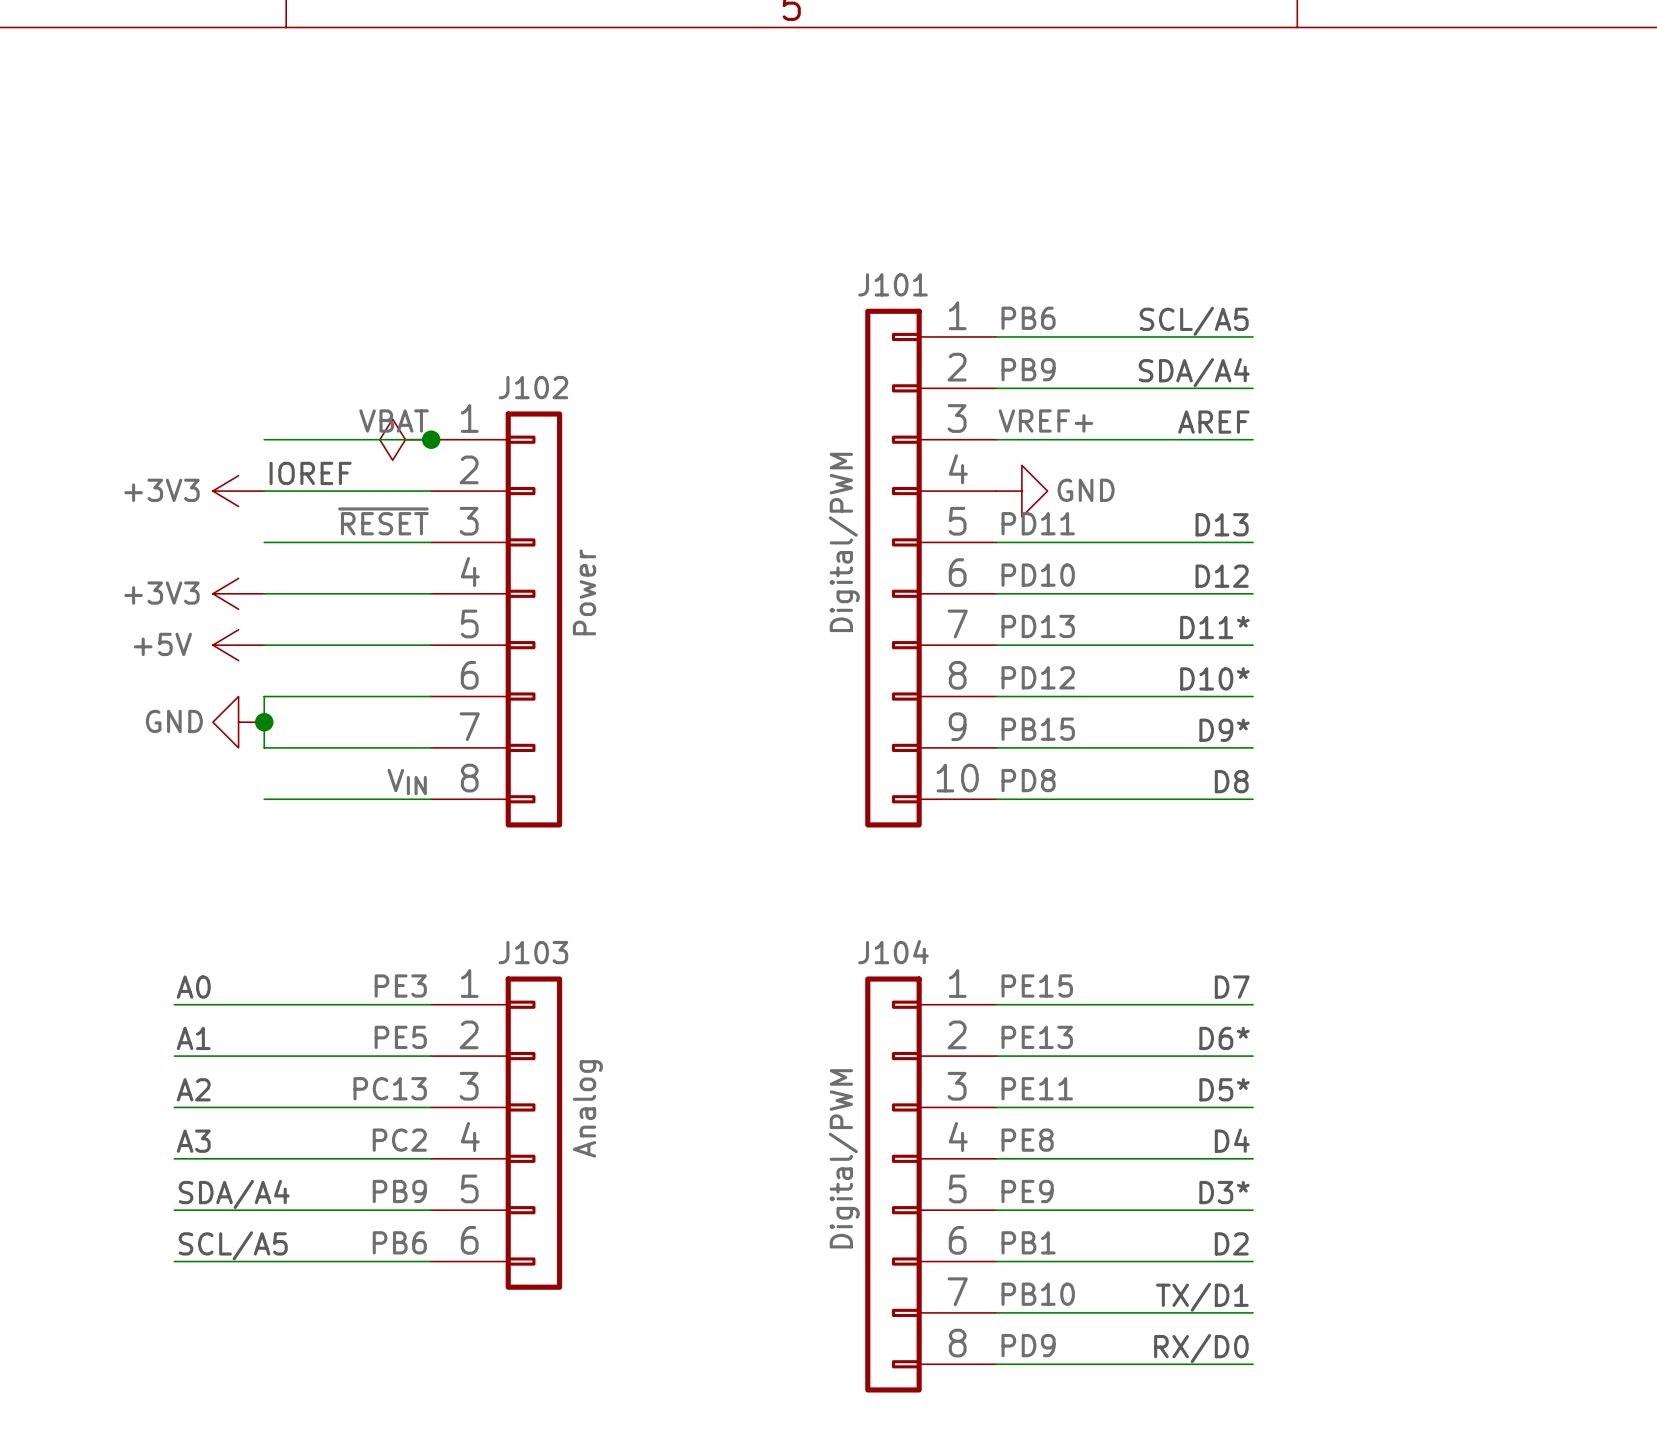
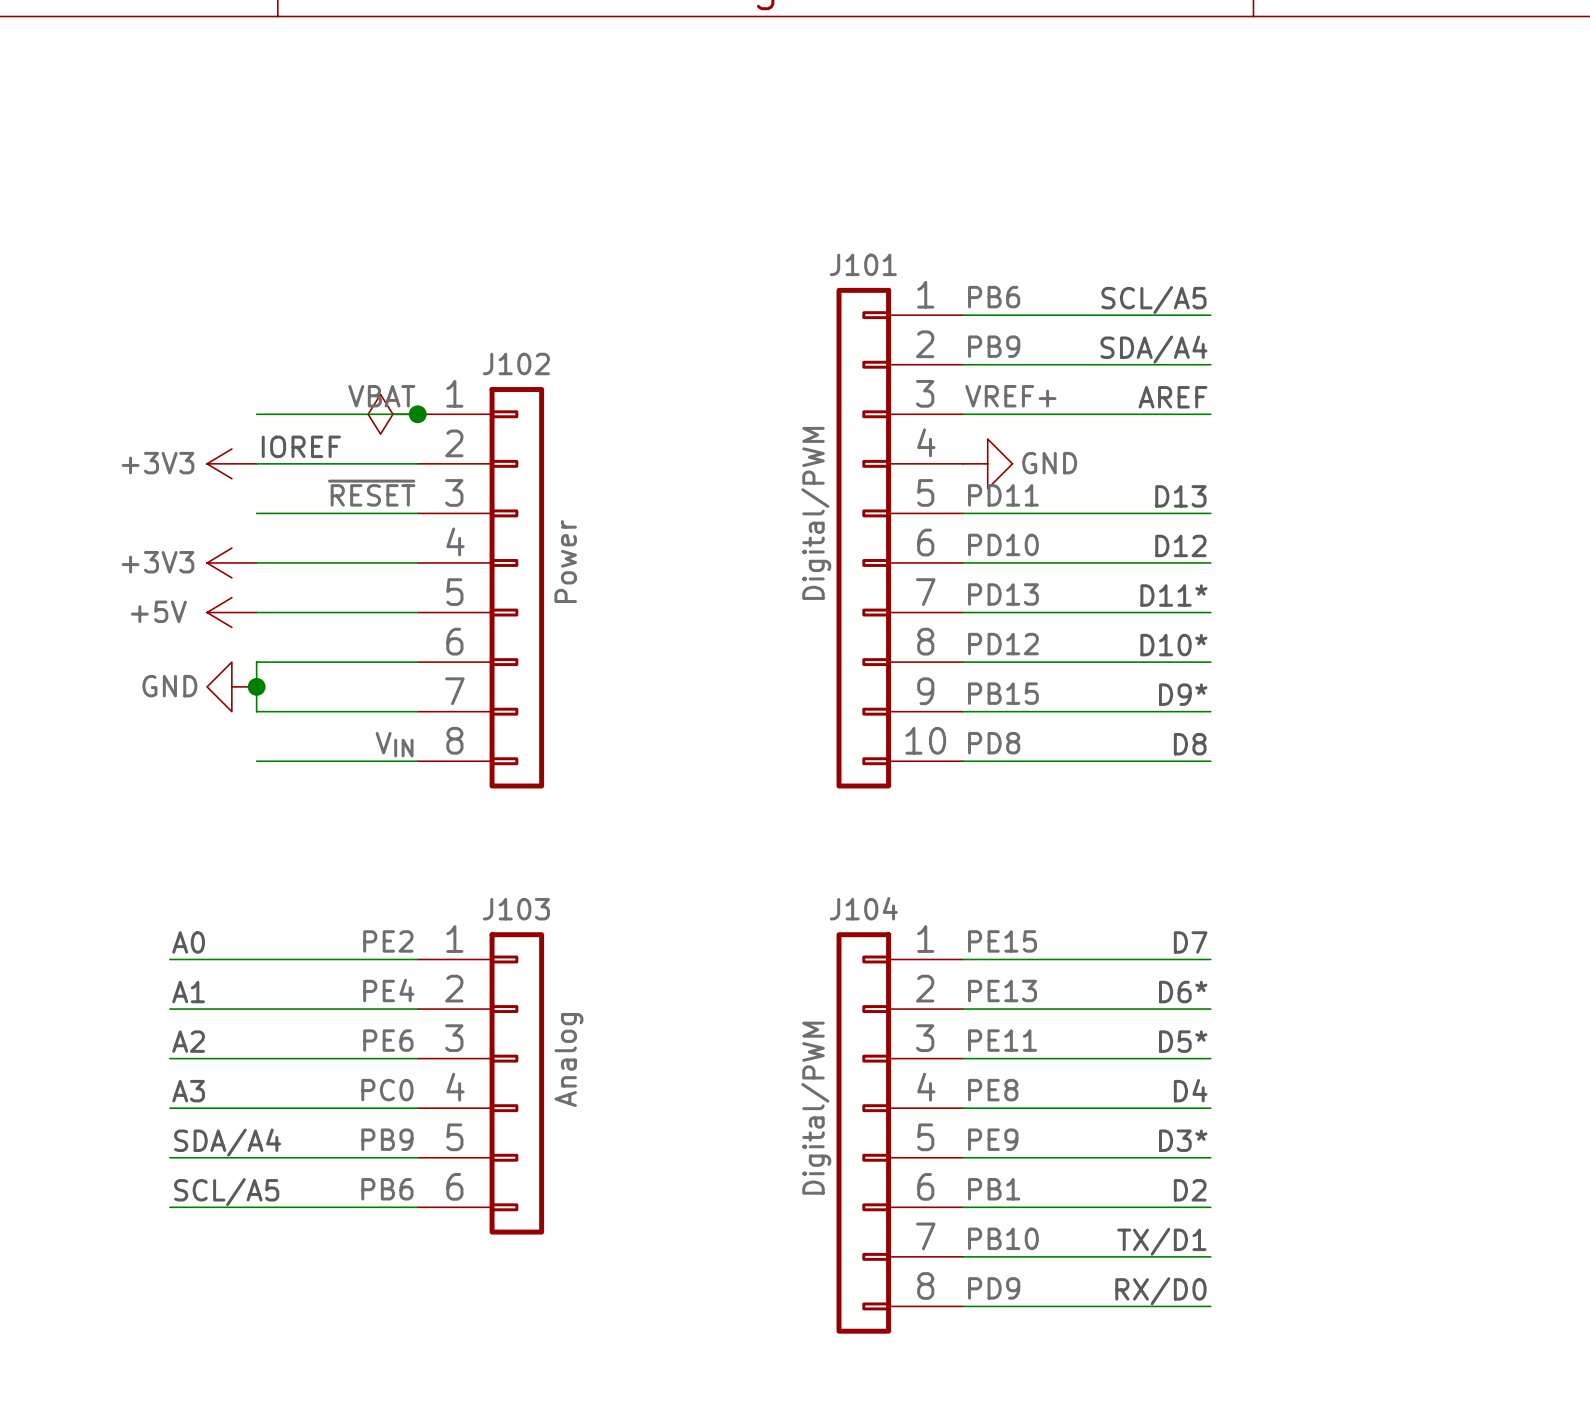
label: PE3 (400, 986) -> PE2 (388, 941)
label: PE5 (400, 1037) -> PE4 (388, 990)
label: PC13 (390, 1088) -> PE6 (388, 1040)
label: PC2 (399, 1140) -> PC0 (387, 1090)

